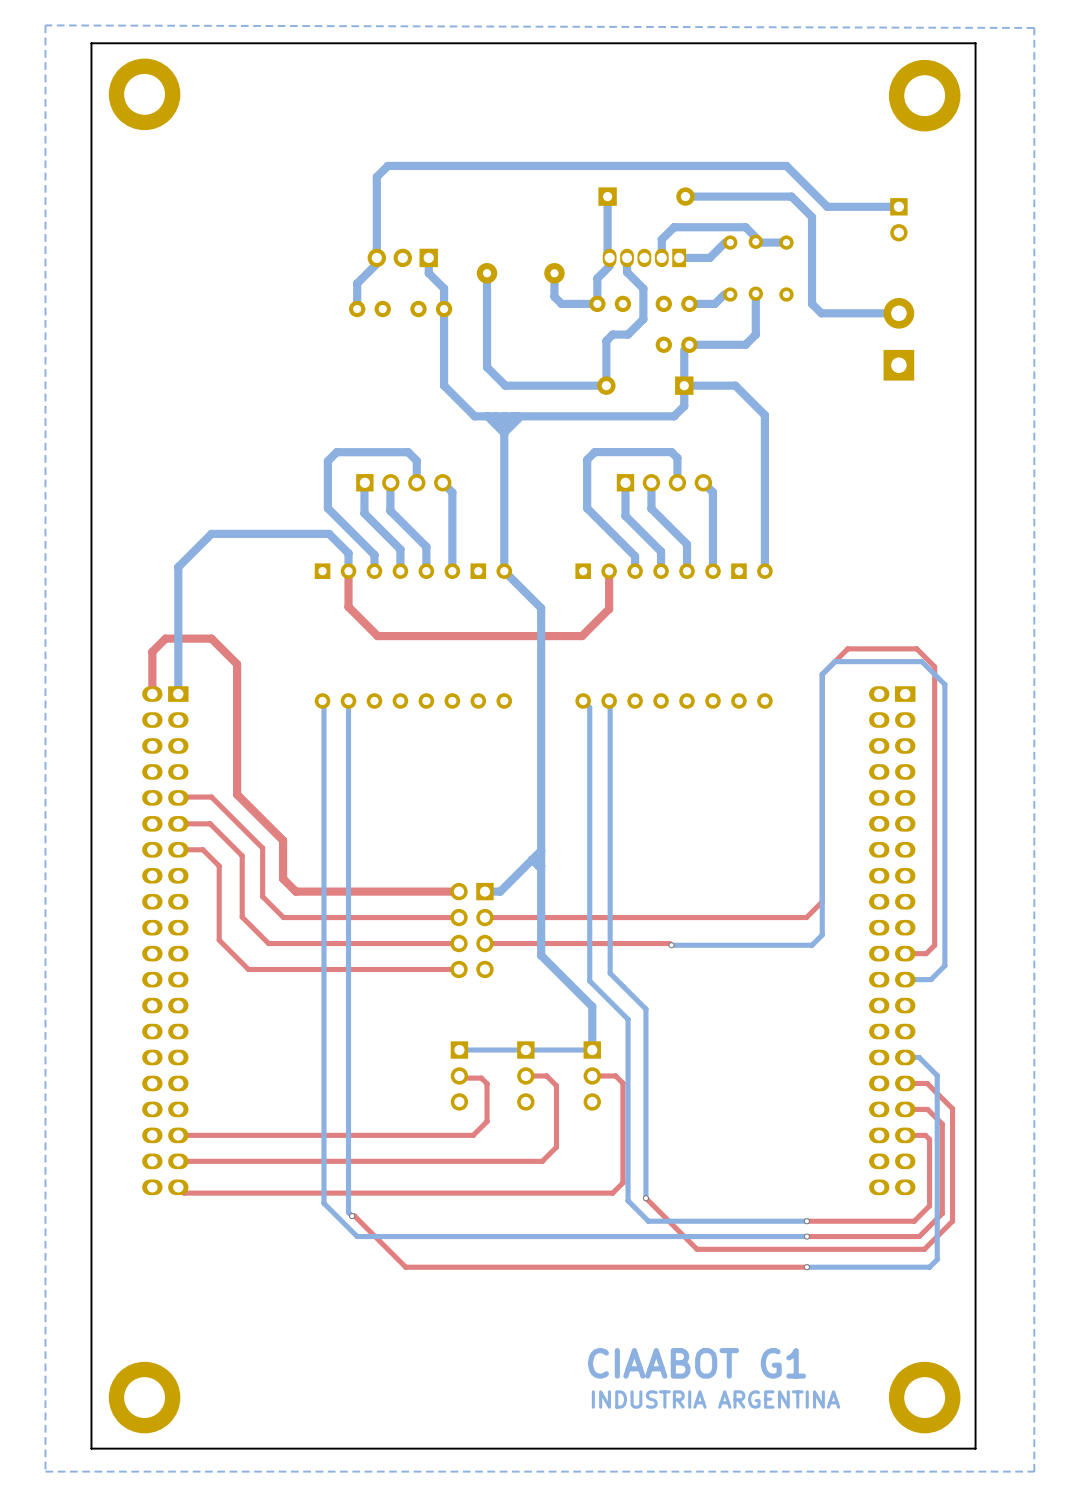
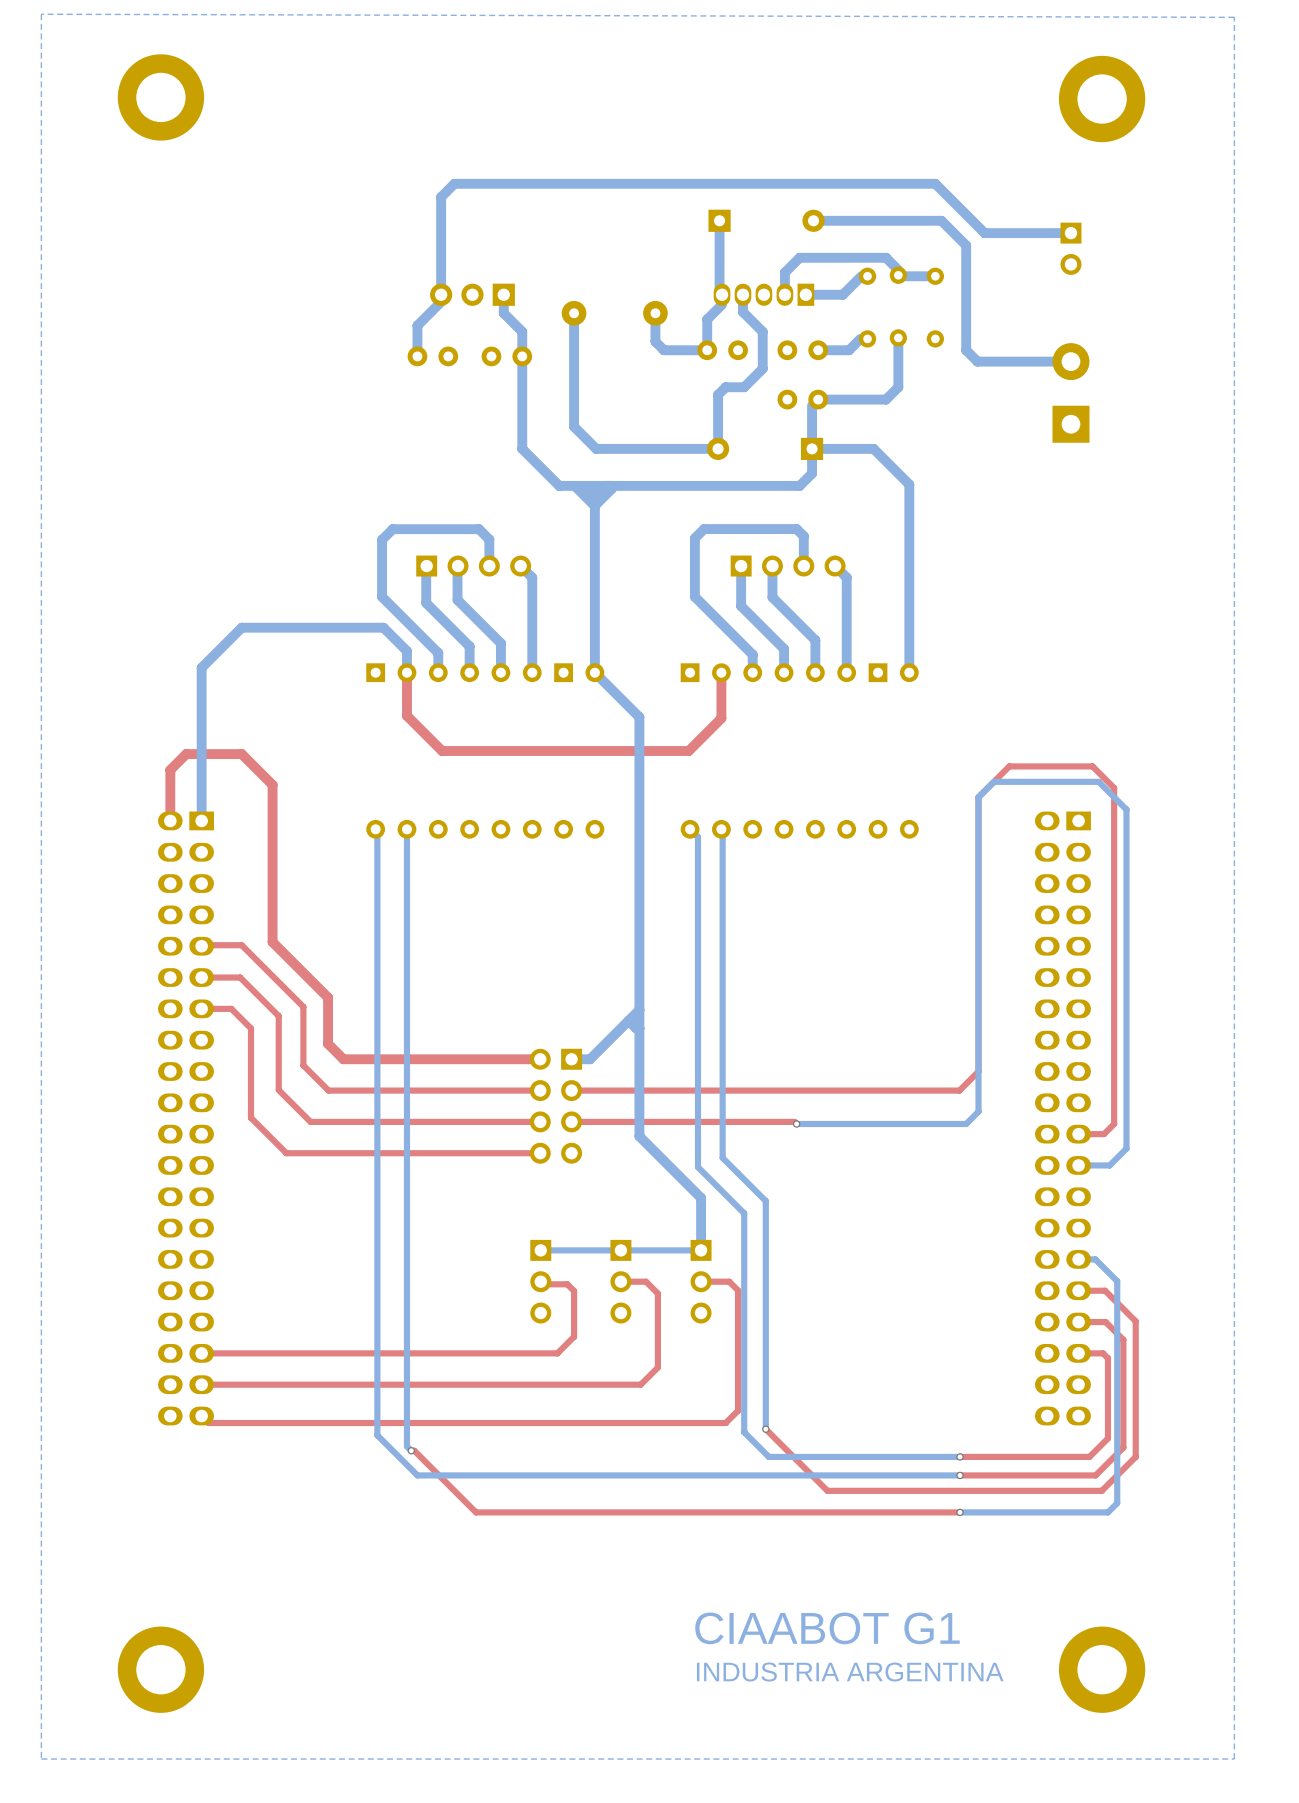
board edge: (975, 43) (975, 1448) (91, 1448) (91, 43) (975, 43) -> none

